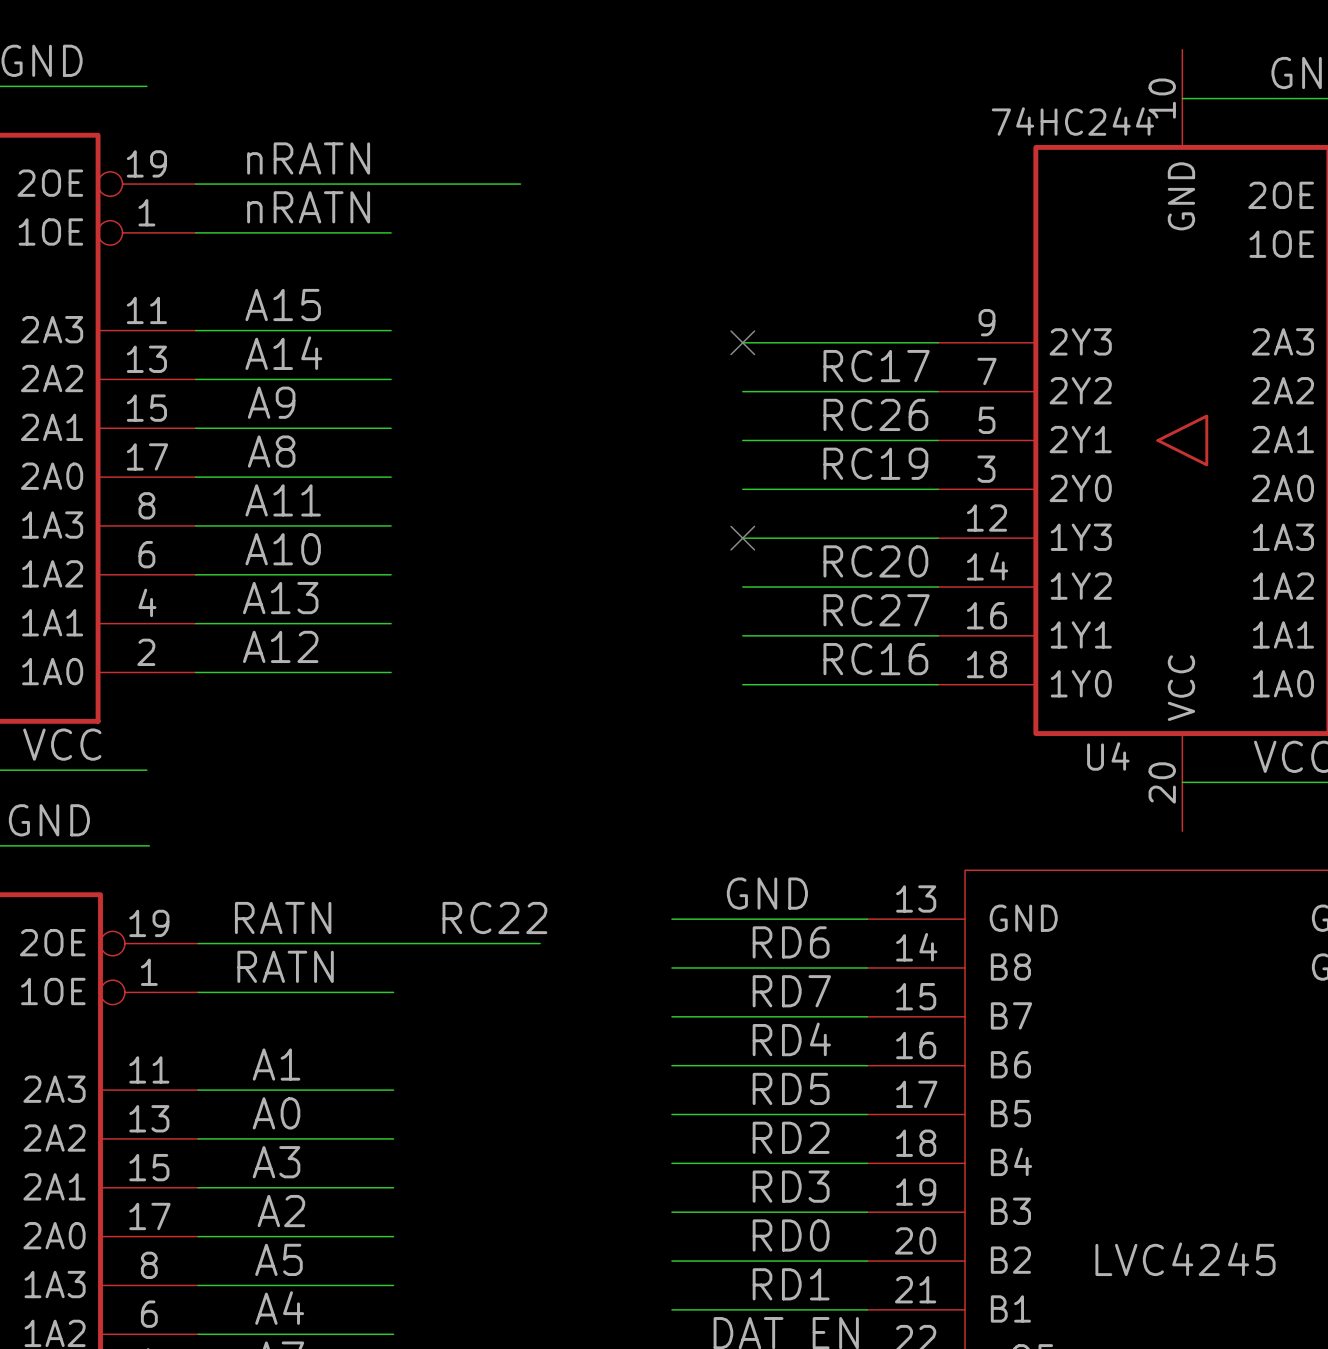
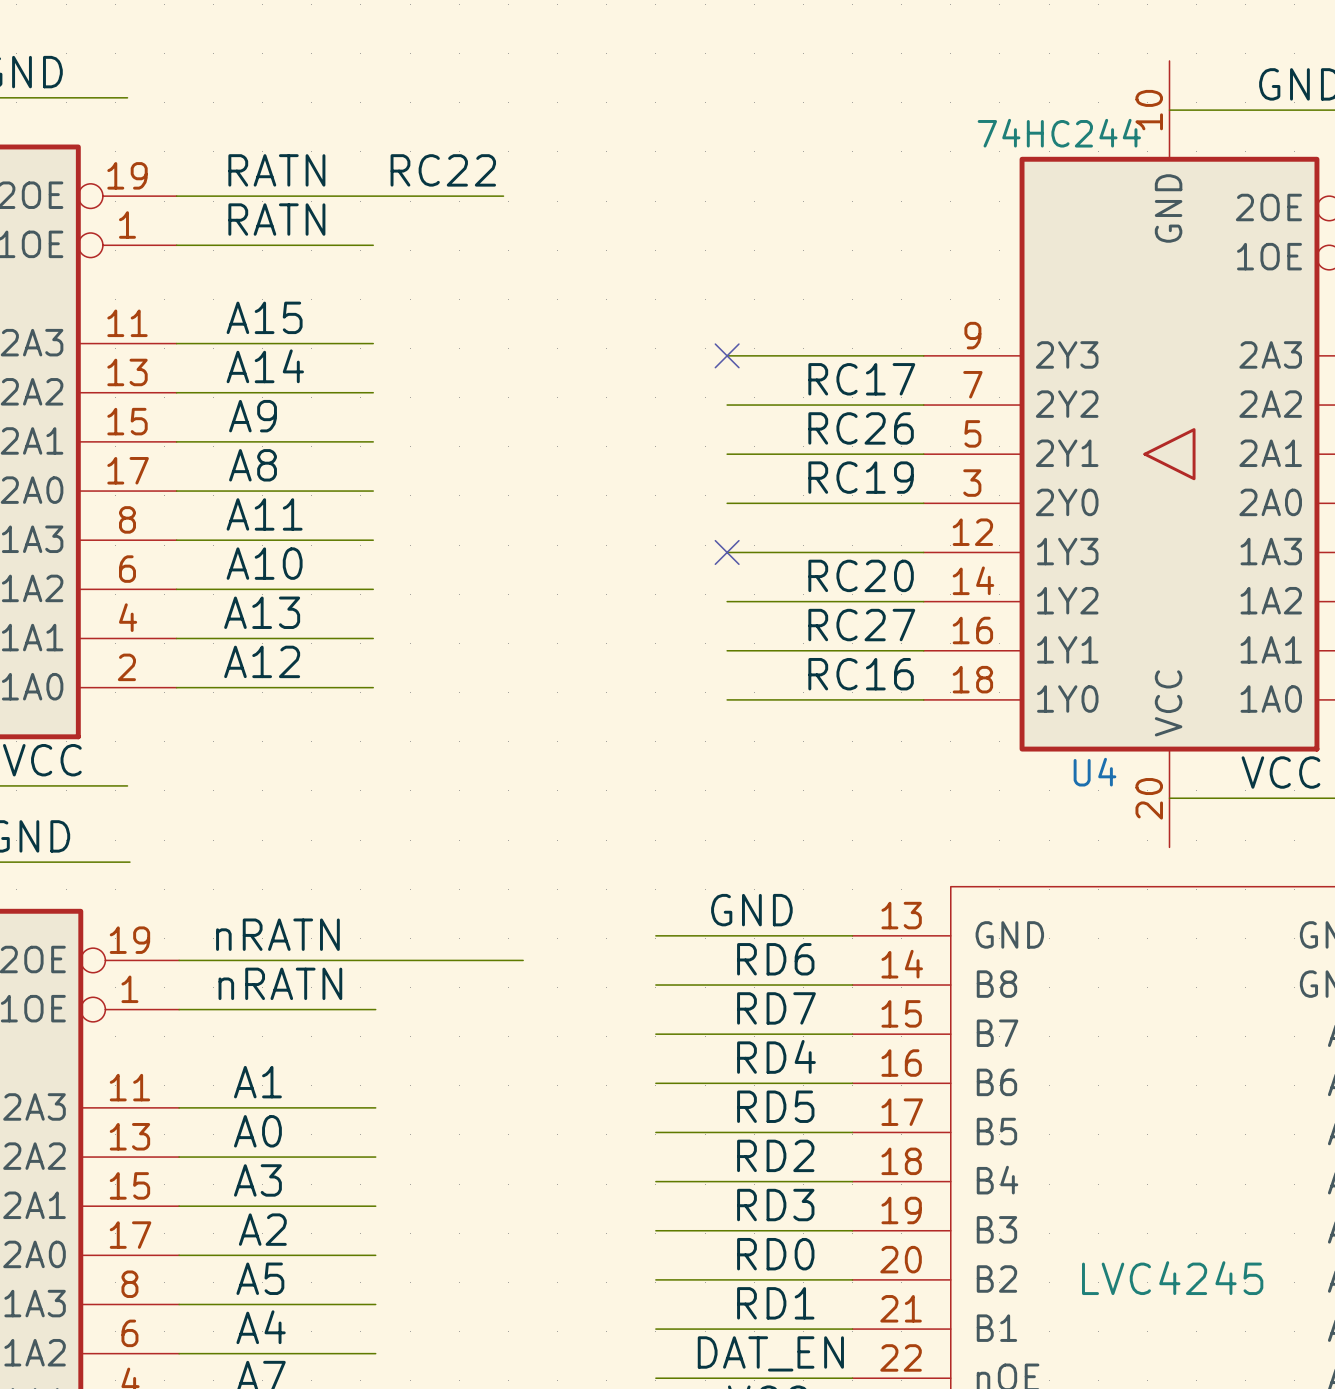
label: nRATN (308, 158) -> RATN (276, 170)
label: none -> RC22 (443, 170)
label: nRATN (308, 207) -> RATN (276, 219)
label: RATN (283, 917) -> nRATN (277, 934)
label: RC22 (494, 917) -> none
label: RATN (285, 966) -> nRATN (280, 983)

